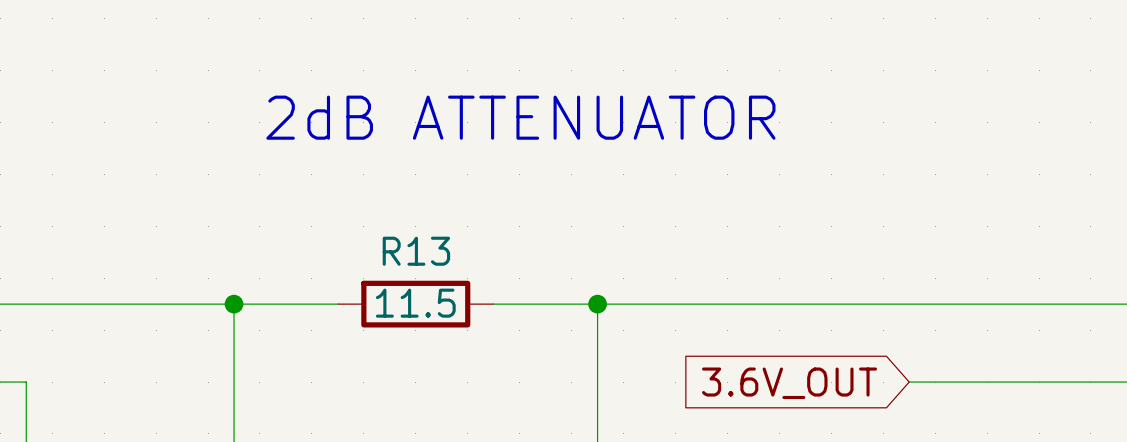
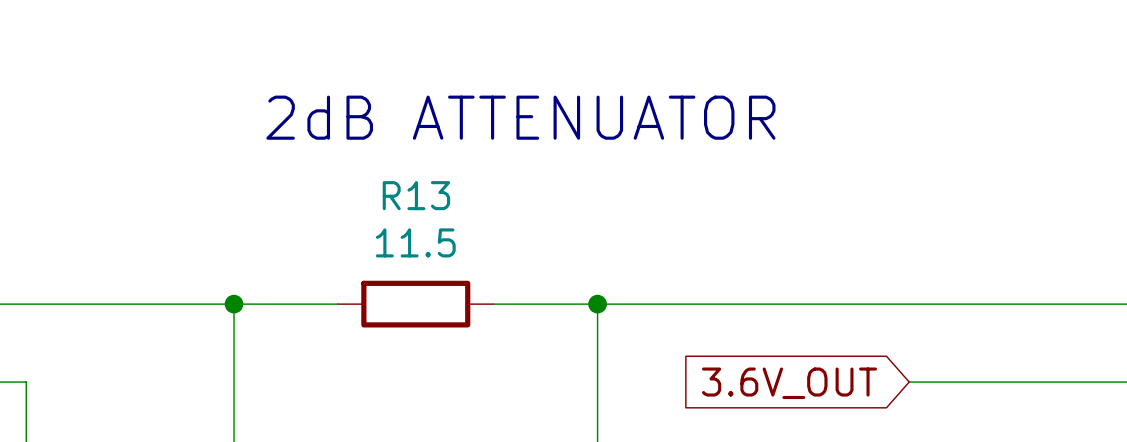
R13 name position: R13 (416, 251) -> R13 (416, 195)
R13 value position: 11.5 (415, 303) -> 11.5 (415, 242)

